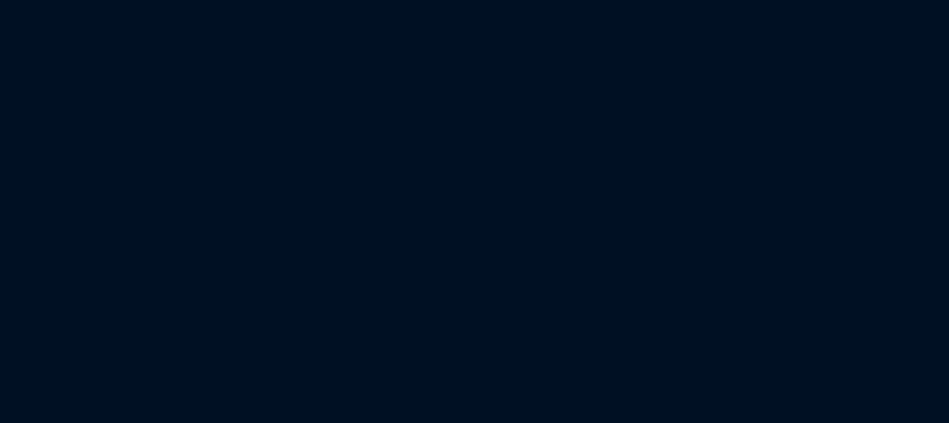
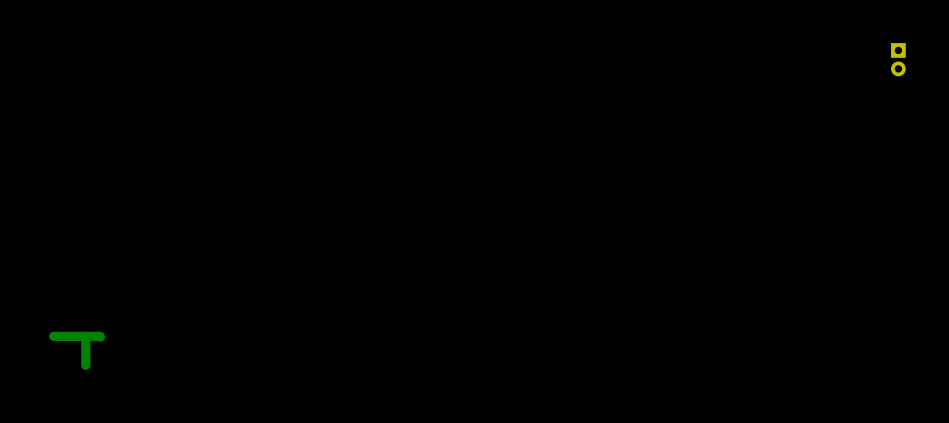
part: none -> (898, 59)
track: none -> (53, 336) (100, 337)
track: none -> (85, 336) (85, 365)

